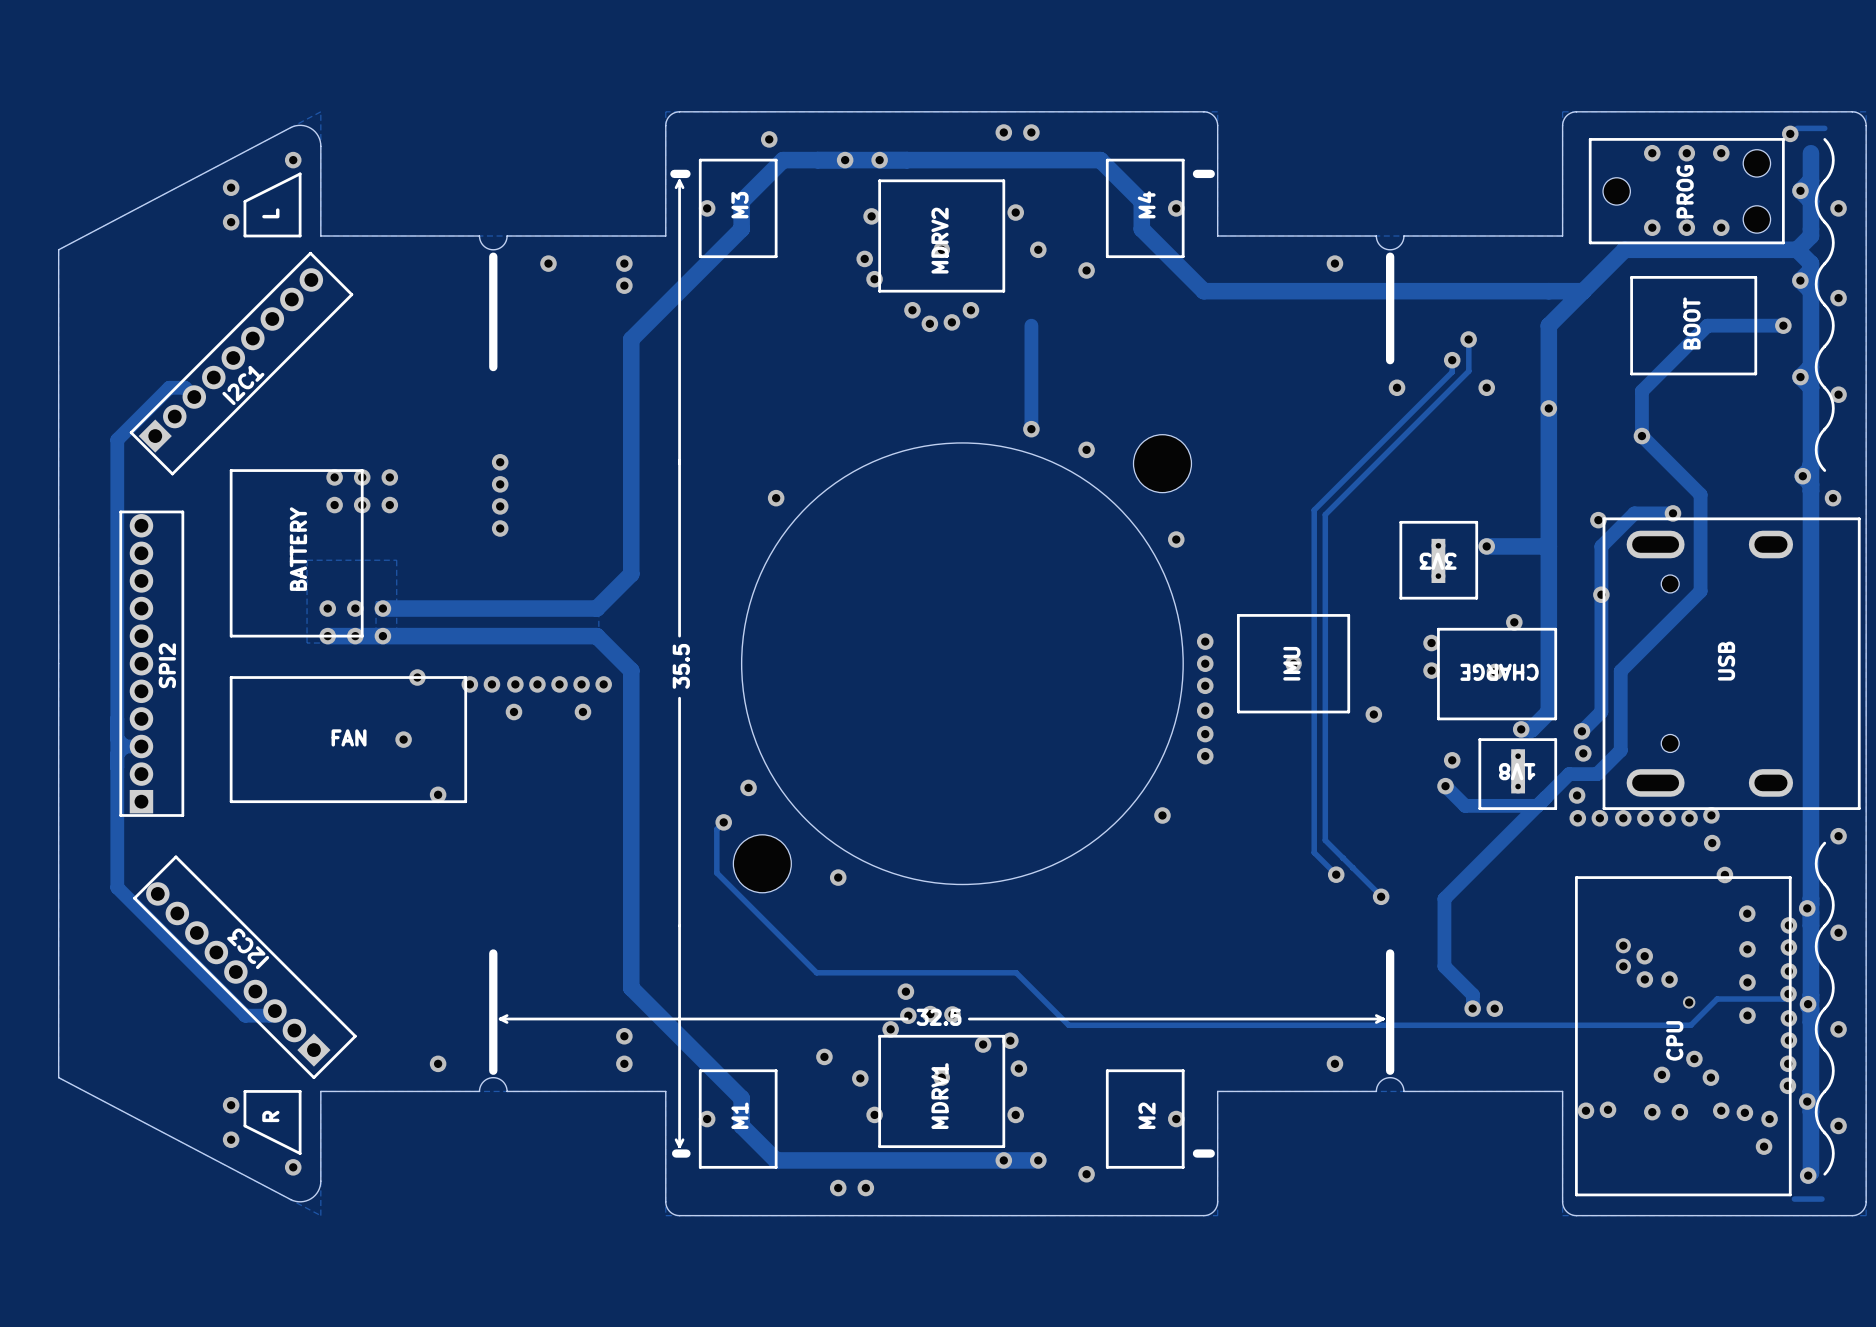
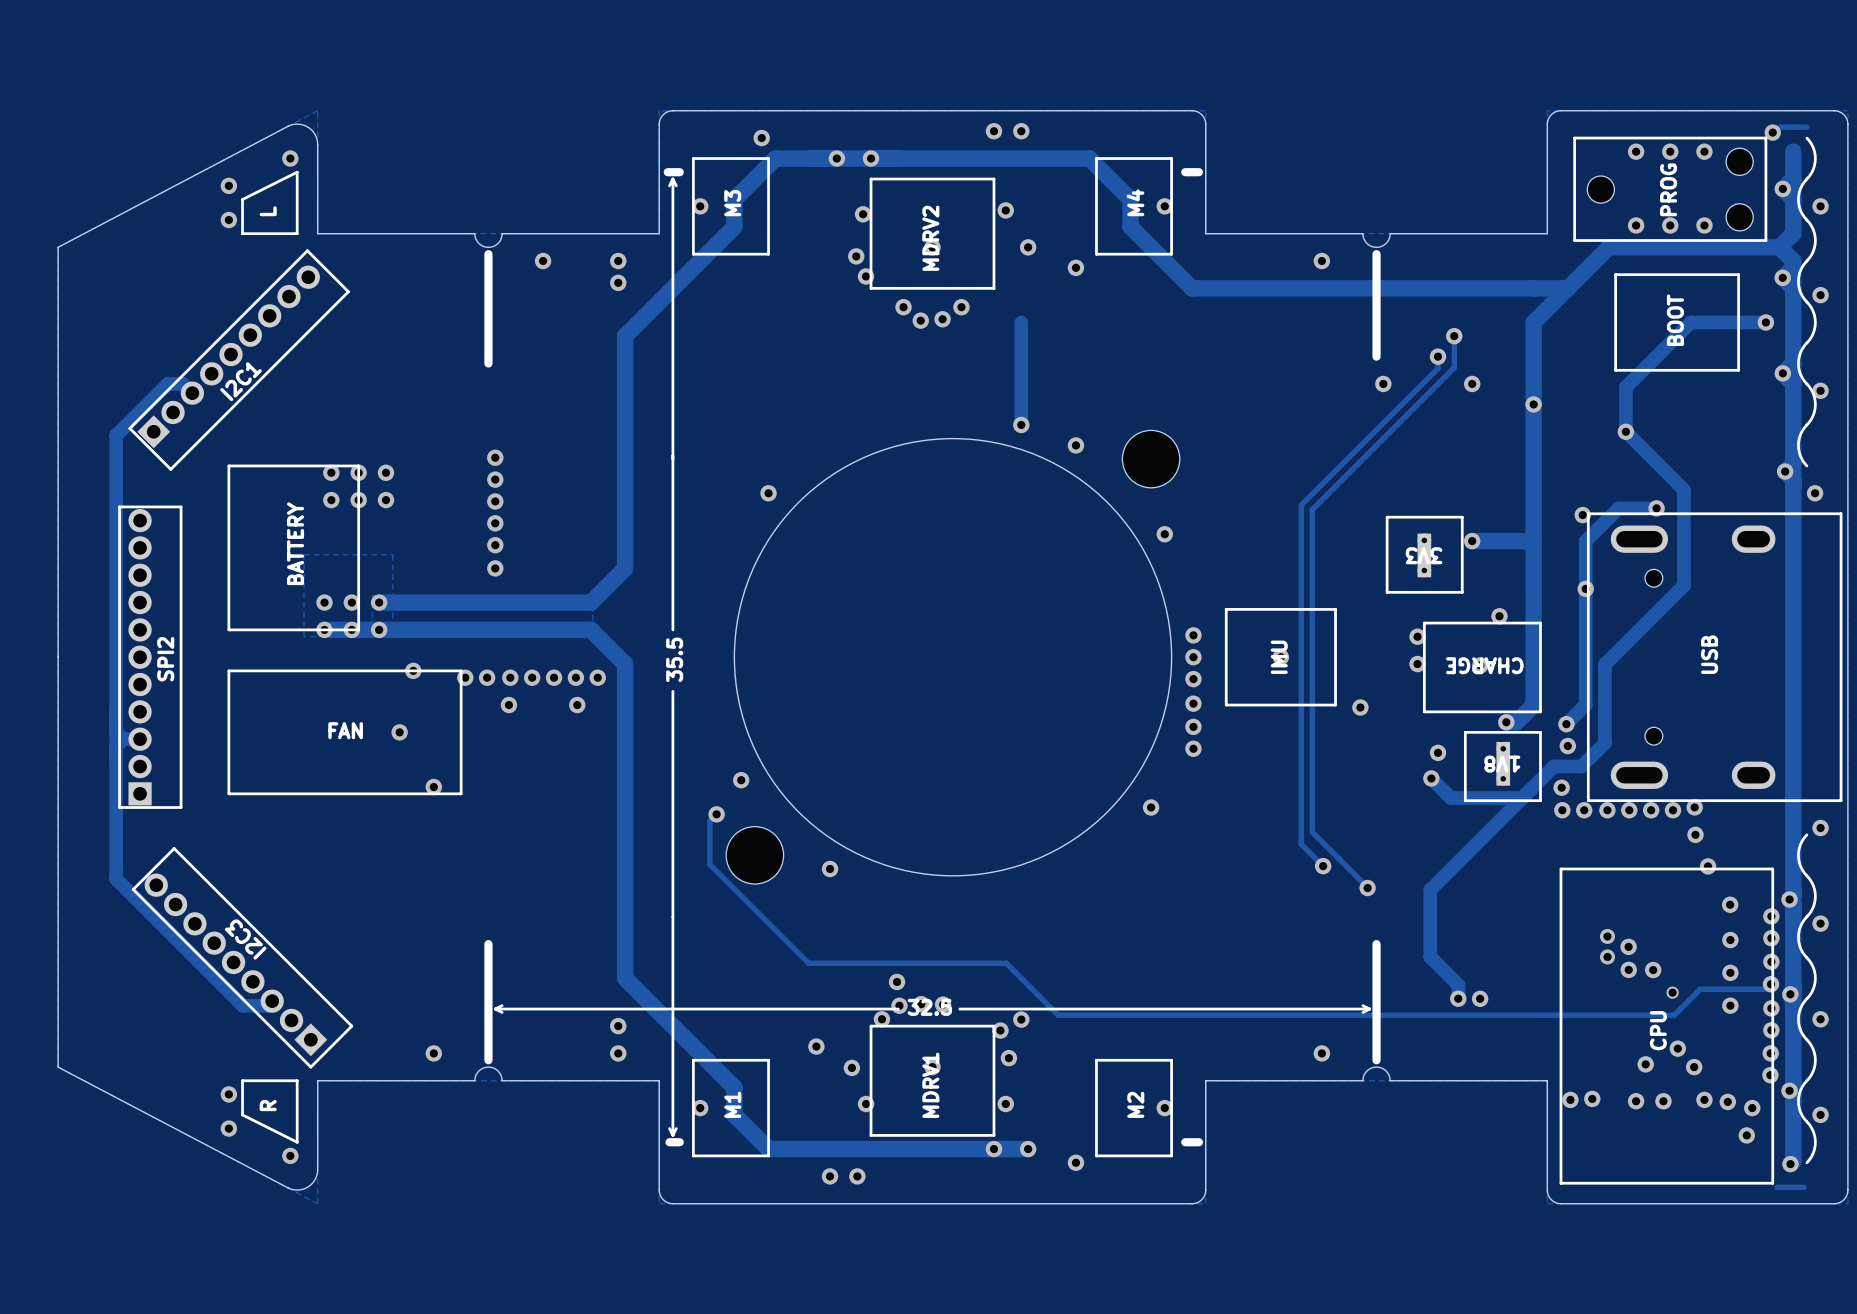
via: none -> (495, 545)
via: none -> (495, 568)
via position: (983, 1044) -> (1021, 1019)

